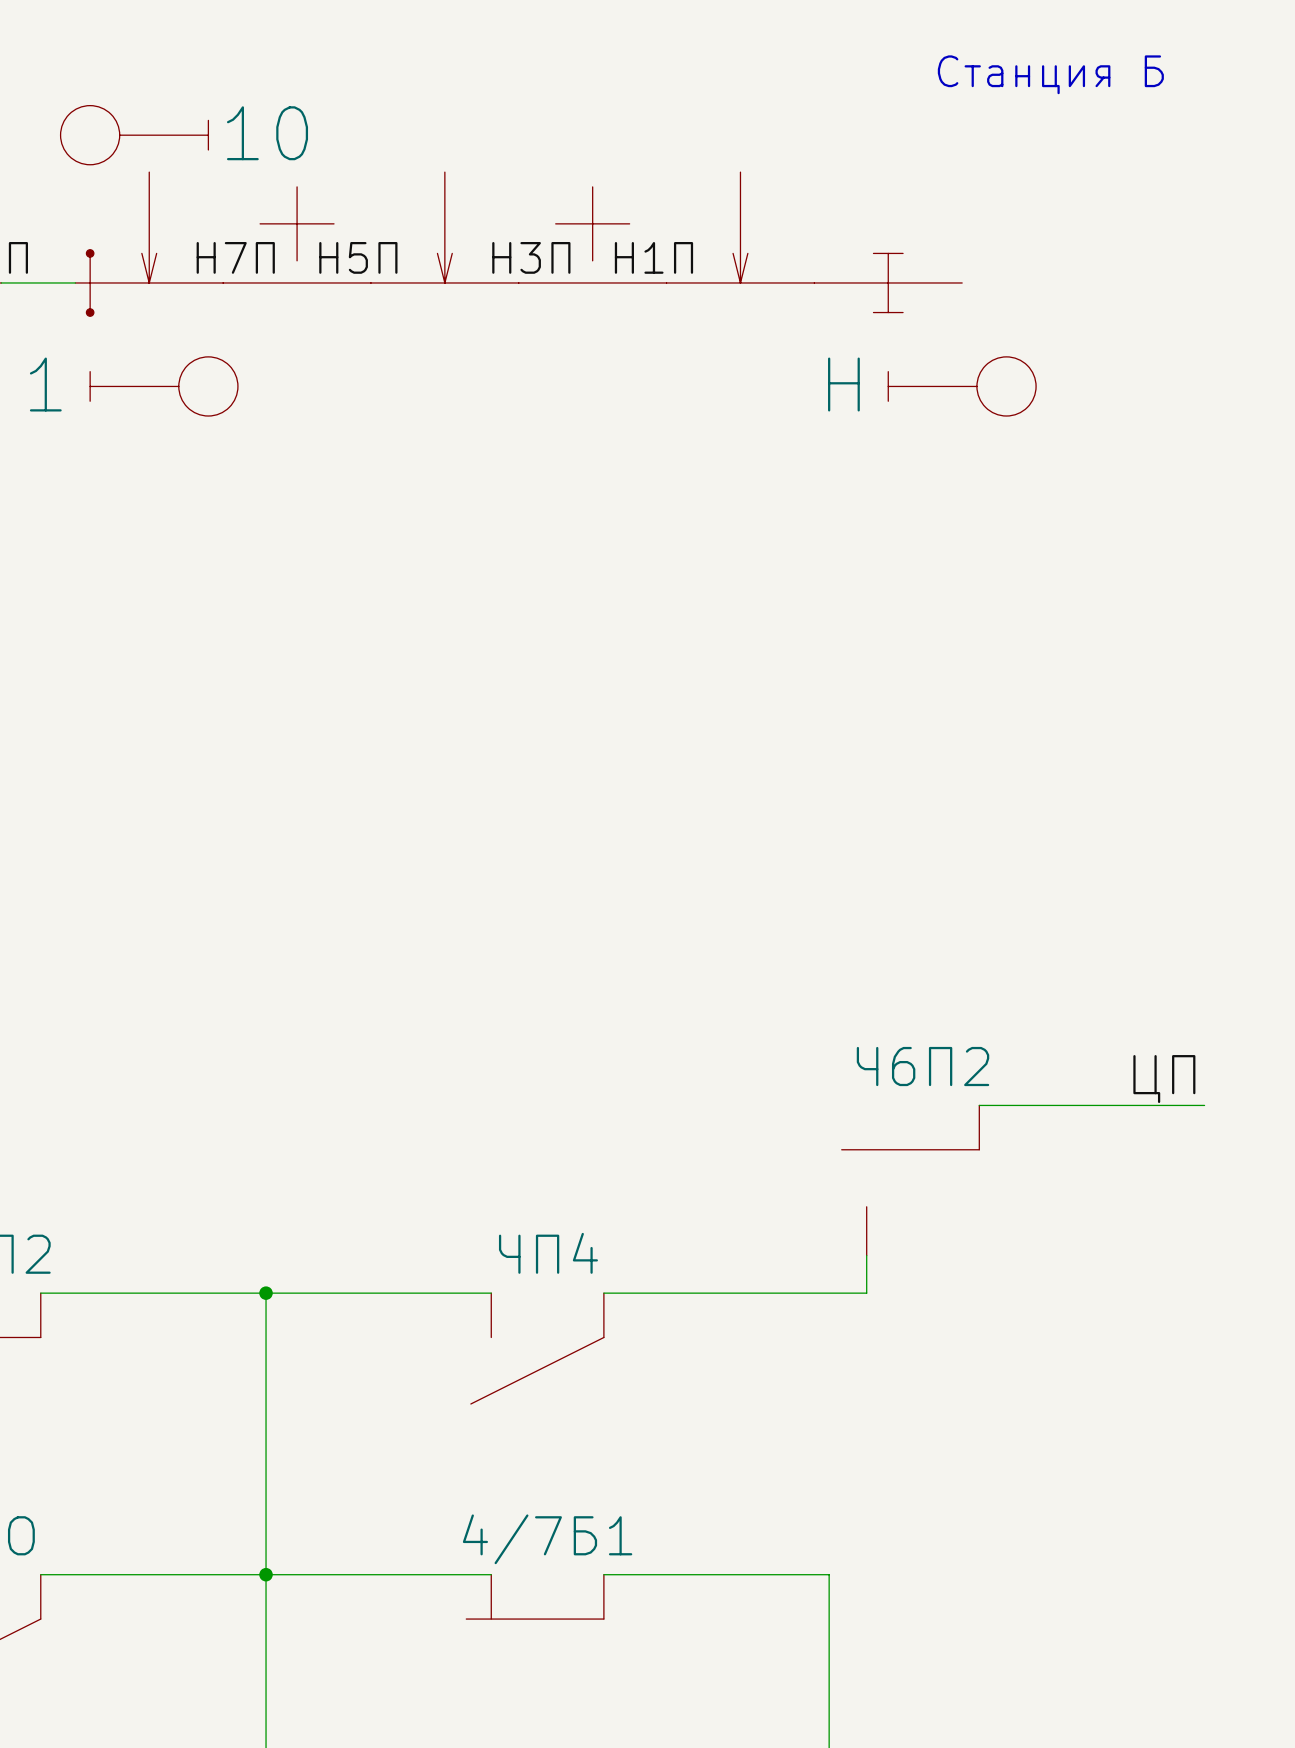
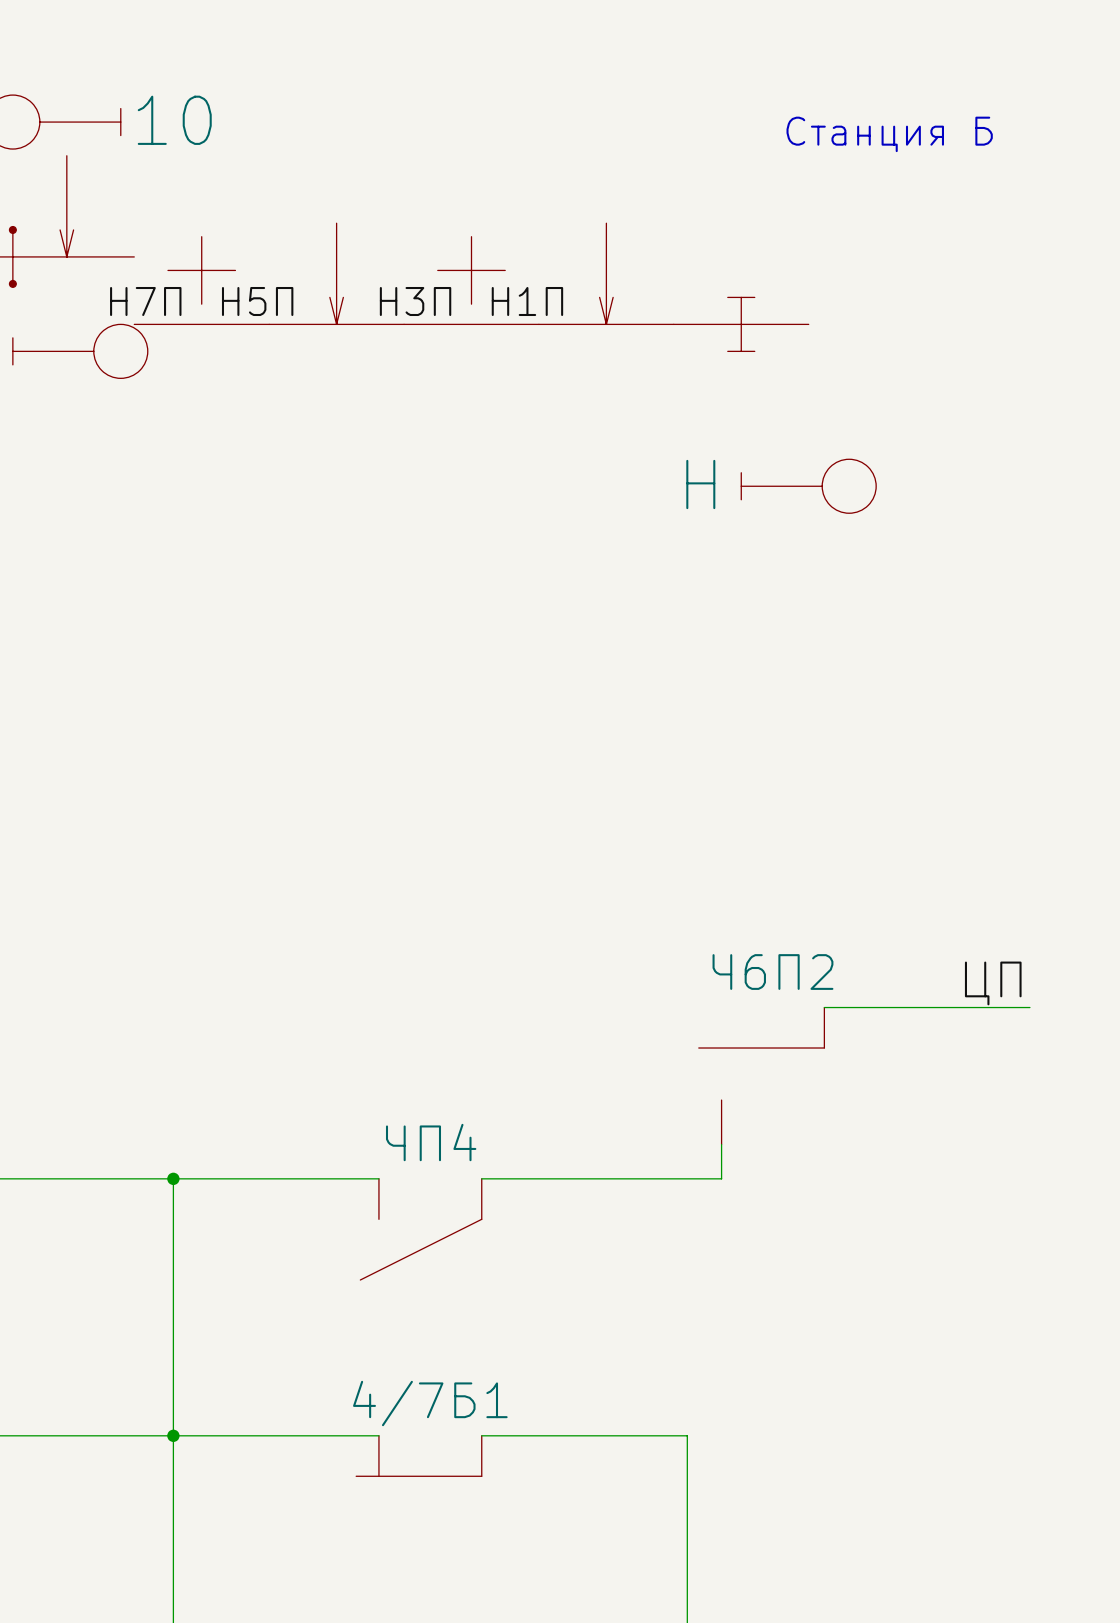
text position: Станция Б (1050, 74) -> Станция Б (889, 134)
part position: (444, 227) -> (336, 273)
part position: (740, 227) -> (606, 273)
part position: (297, 234) -> (201, 280)
part position: (592, 234) -> (471, 280)
label position: Н7П (235, 257) -> Н7П (145, 301)
label position: Н5П (358, 257) -> Н5П (257, 301)
label position: Н3П (531, 257) -> Н3П (415, 301)
label position: Н1П (653, 257) -> Н1П (527, 301)
part position: (888, 282) -> (741, 324)
part position: (962, 386) -> (808, 486)

